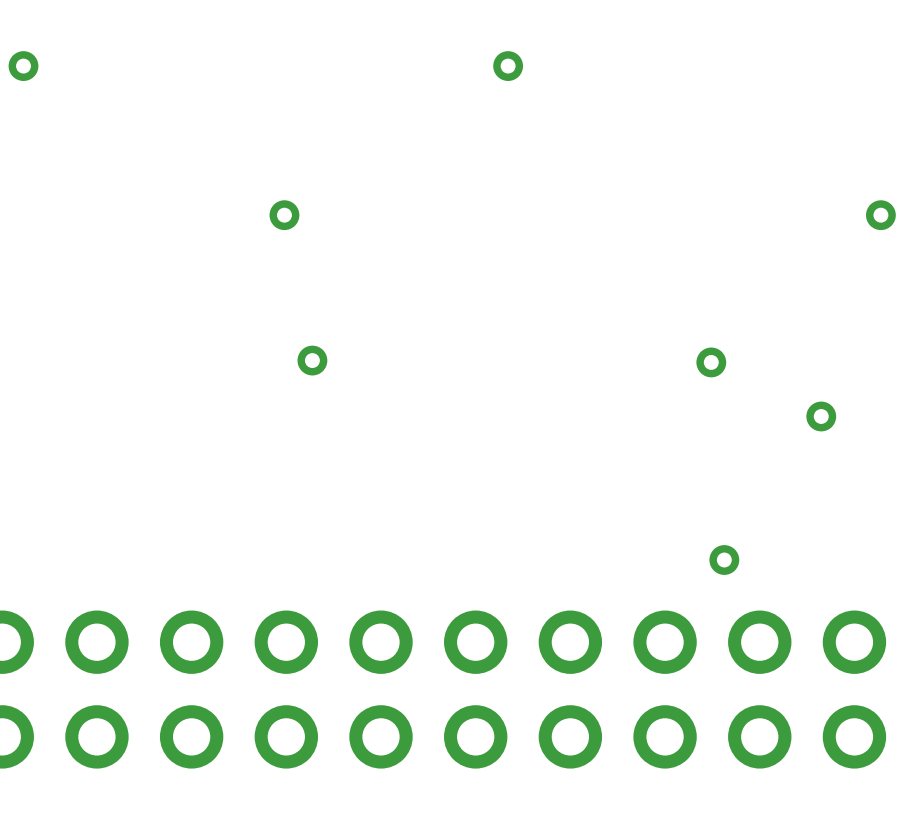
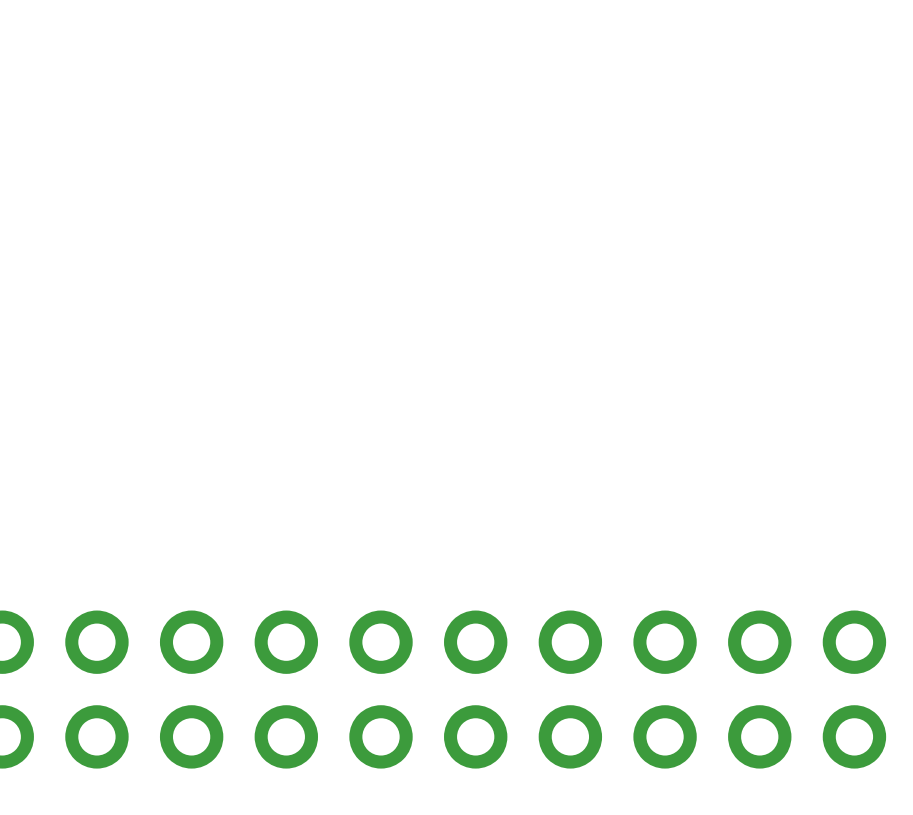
via: (23, 66) -> none
via: (508, 66) -> none
via: (284, 215) -> none
via: (880, 215) -> none
via: (312, 360) -> none
via: (711, 362) -> none
via: (821, 416) -> none
via: (724, 560) -> none

